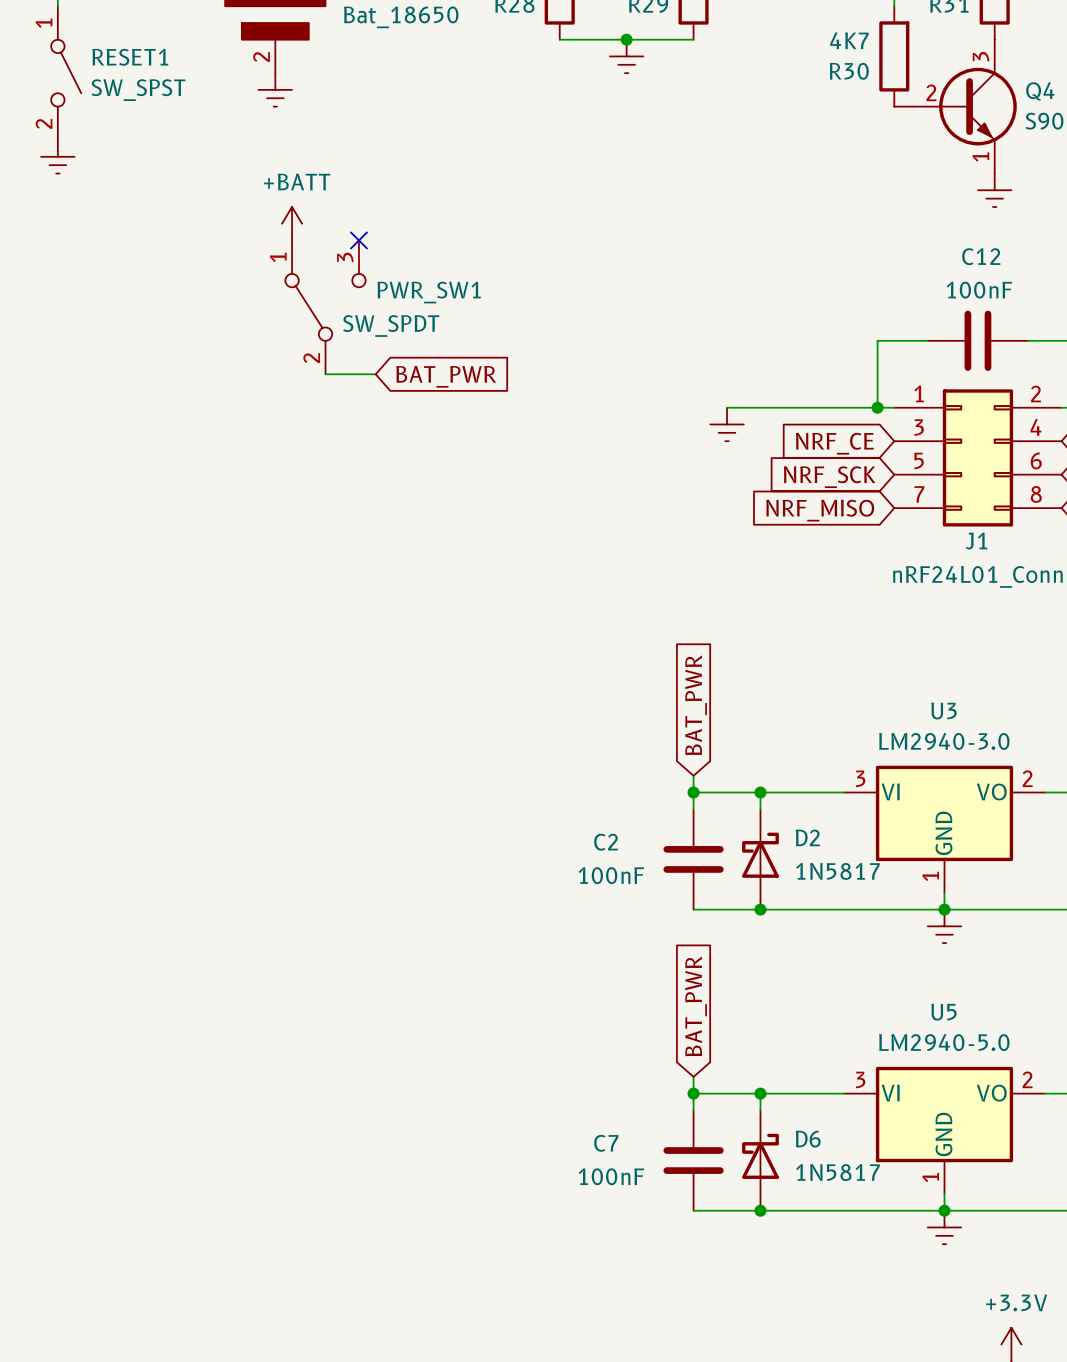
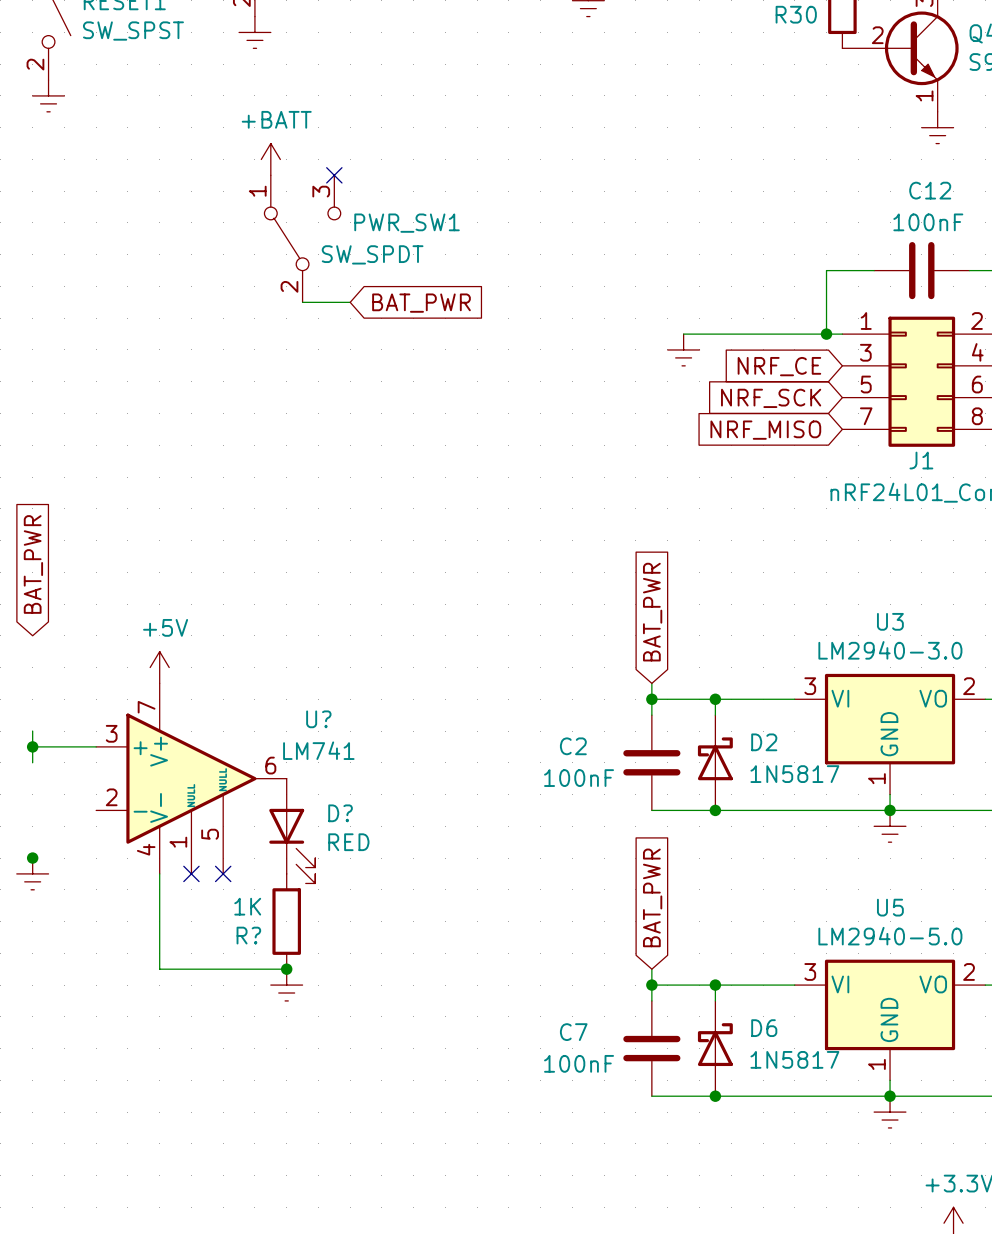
global label: none -> BAT_PWR (33, 564)
power symbol: none -> +5V (159, 667)
wire: none -> (32, 731) (32, 762)
wire: none -> (32, 746) (96, 746)
junction: none -> (32, 746)
U?: none -> LM741 (191, 778)
D?: none -> RED (292, 831)
junction: none -> (32, 858)
power symbol: none -> (32, 873)
wire: none -> (159, 873) (159, 969) (286, 969)
no-connect mark: none -> (191, 873)
no-connect mark: none -> (223, 873)
R?: none -> 1K (286, 921)
junction: none -> (286, 969)
power symbol: none -> (286, 985)

